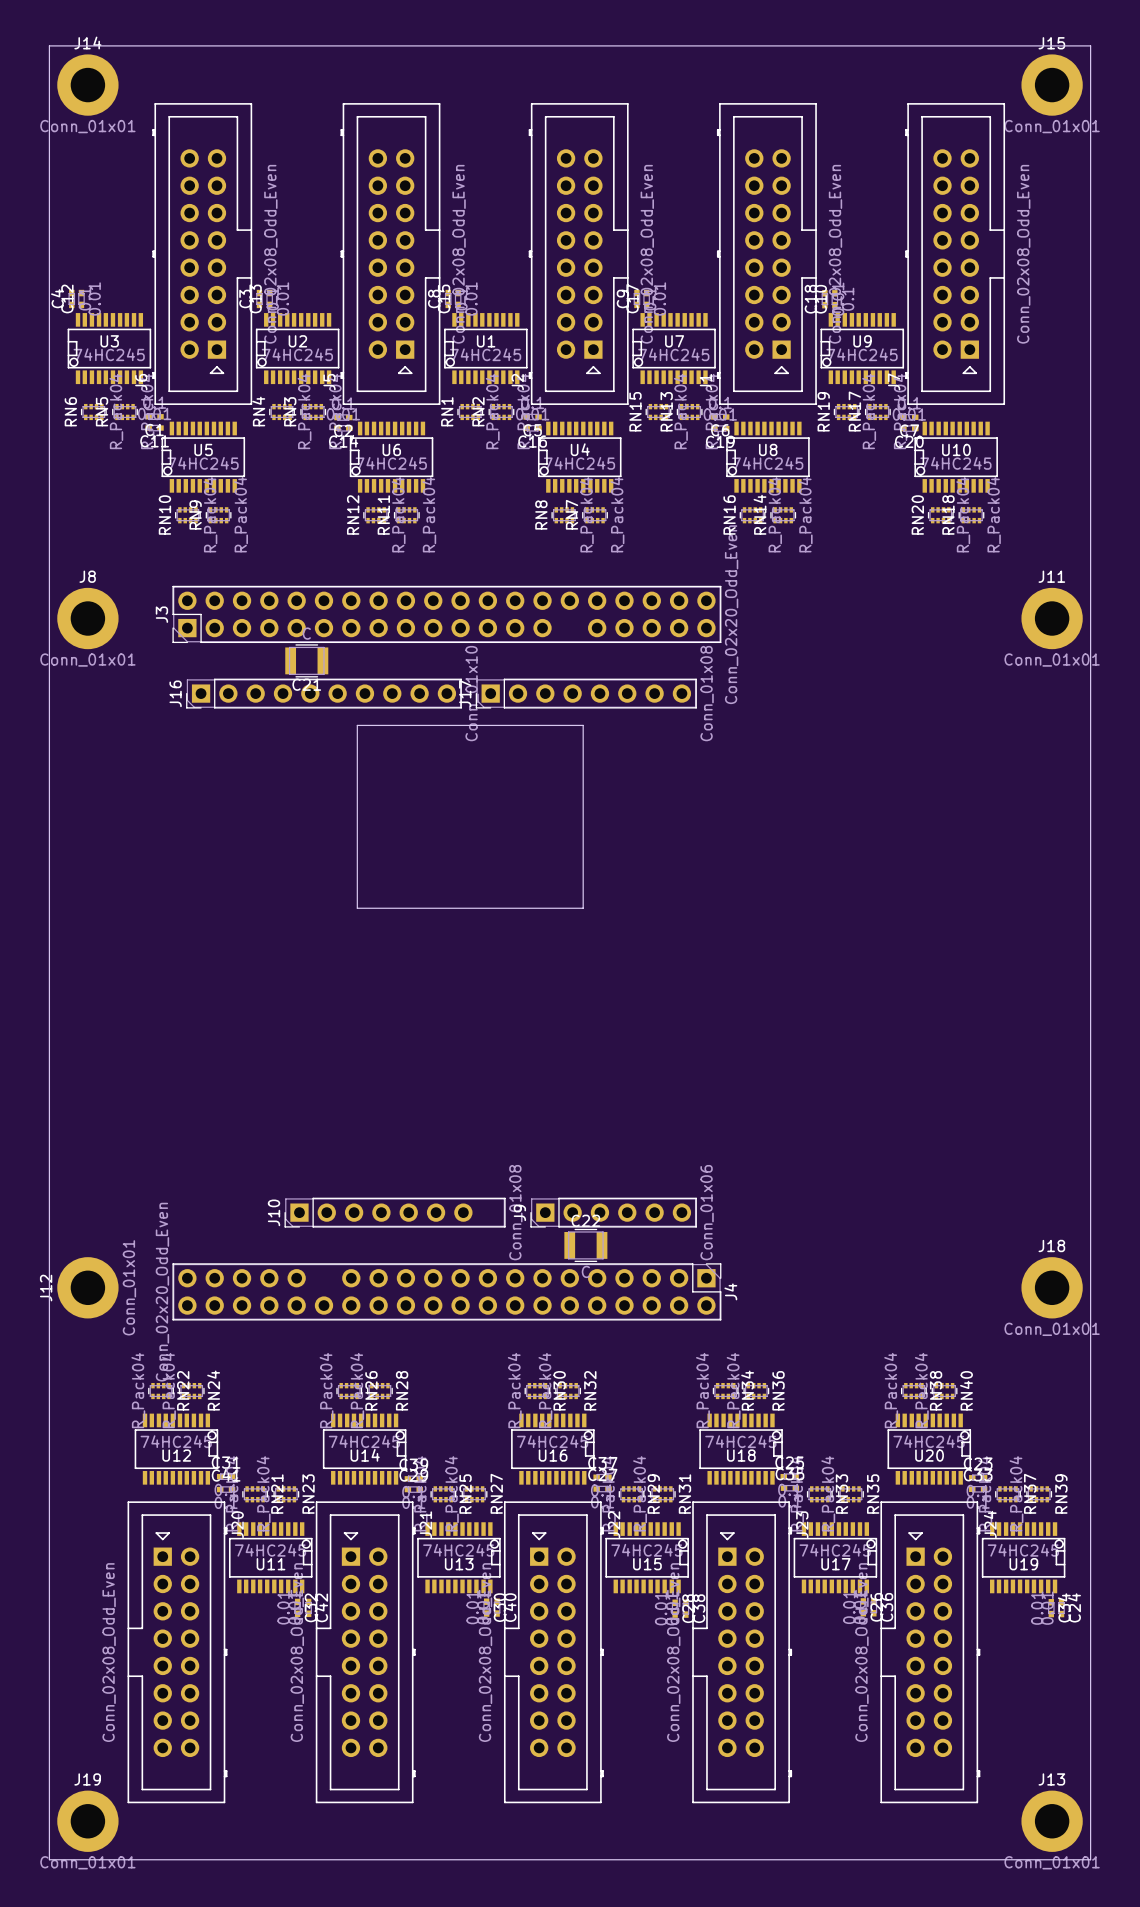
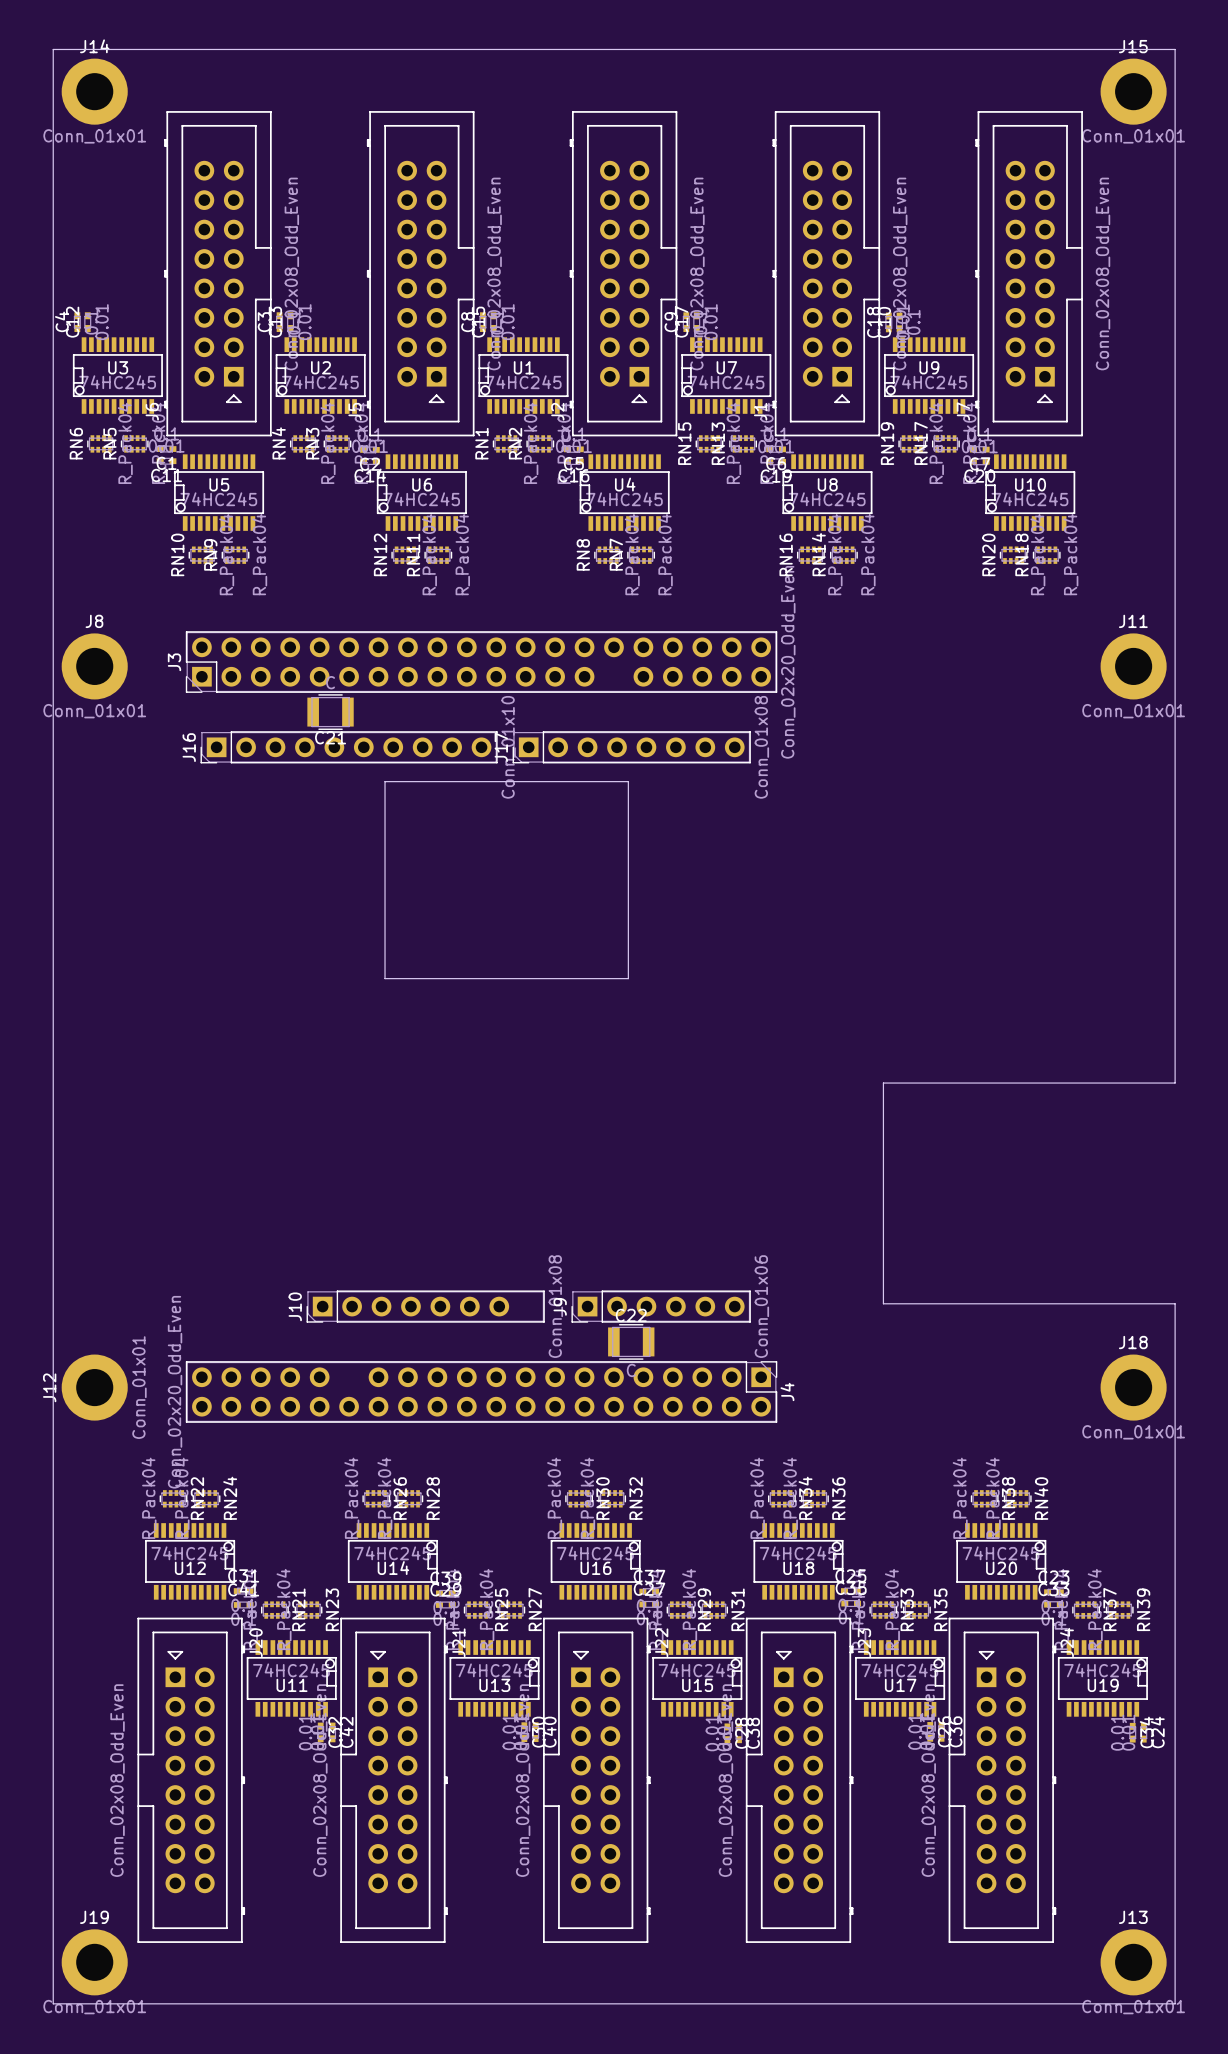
board edge: (1090, 1005) (1090, 1210) -> (1175, 1083) (883, 1083) (883, 1303) (1175, 1303)

